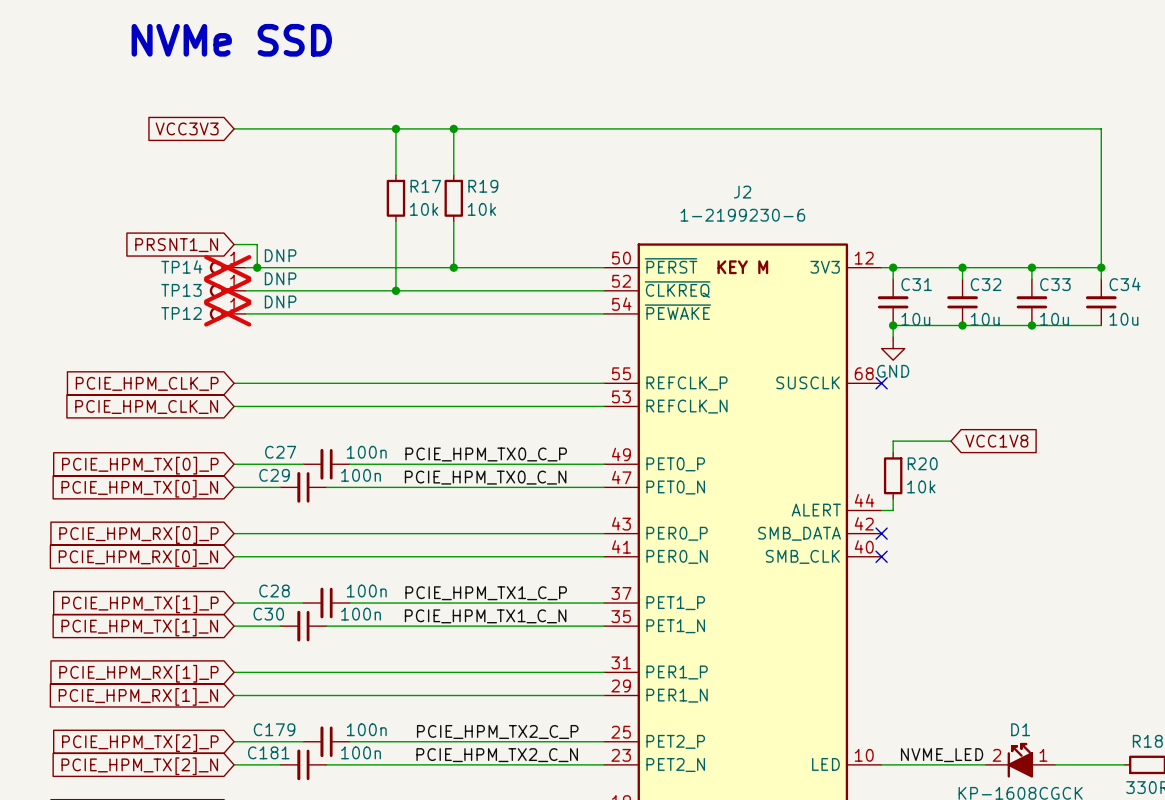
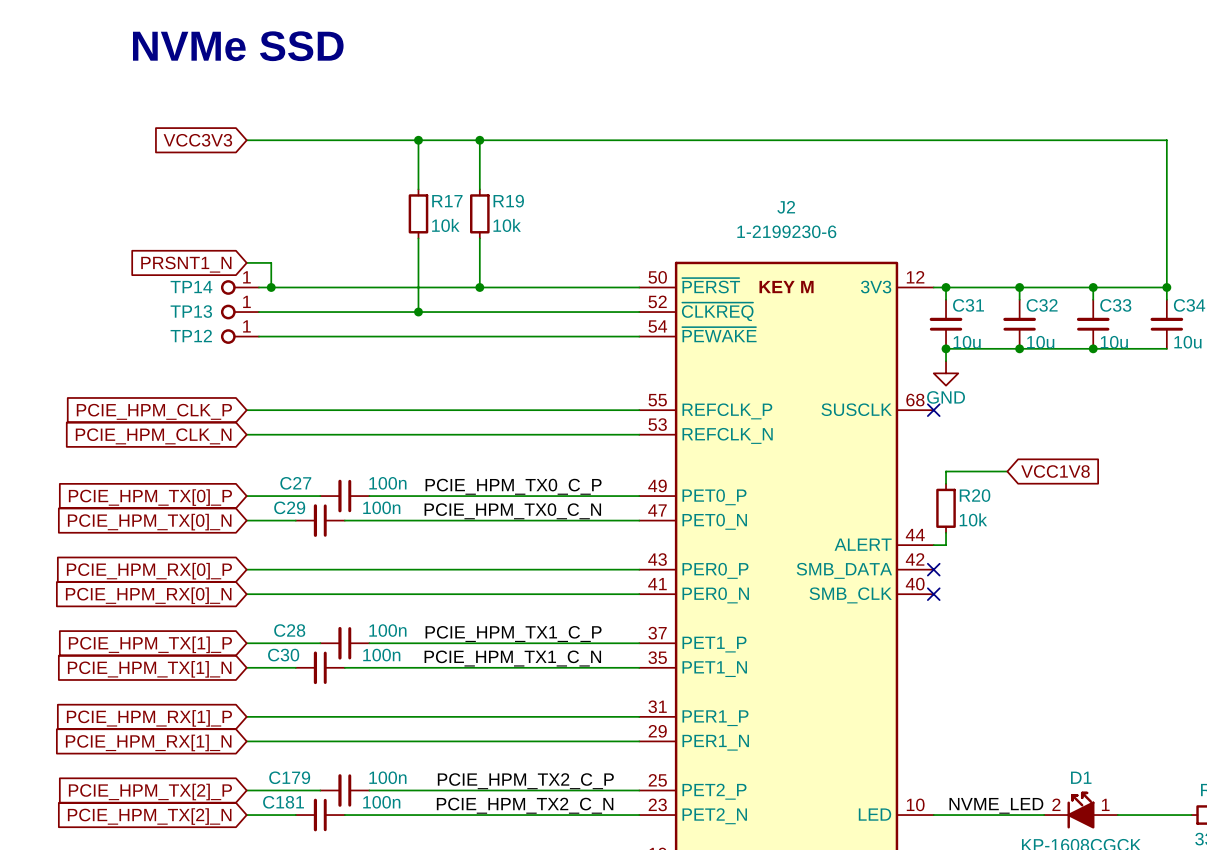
TP14 text: DNP (280, 255) -> none
TP14 do-not-place cross: (227, 267) -> none
TP13 text: DNP (280, 278) -> none
TP13 do-not-place cross: (227, 290) -> none
TP12 text: DNP (280, 301) -> none
TP12 do-not-place cross: (227, 313) -> none

